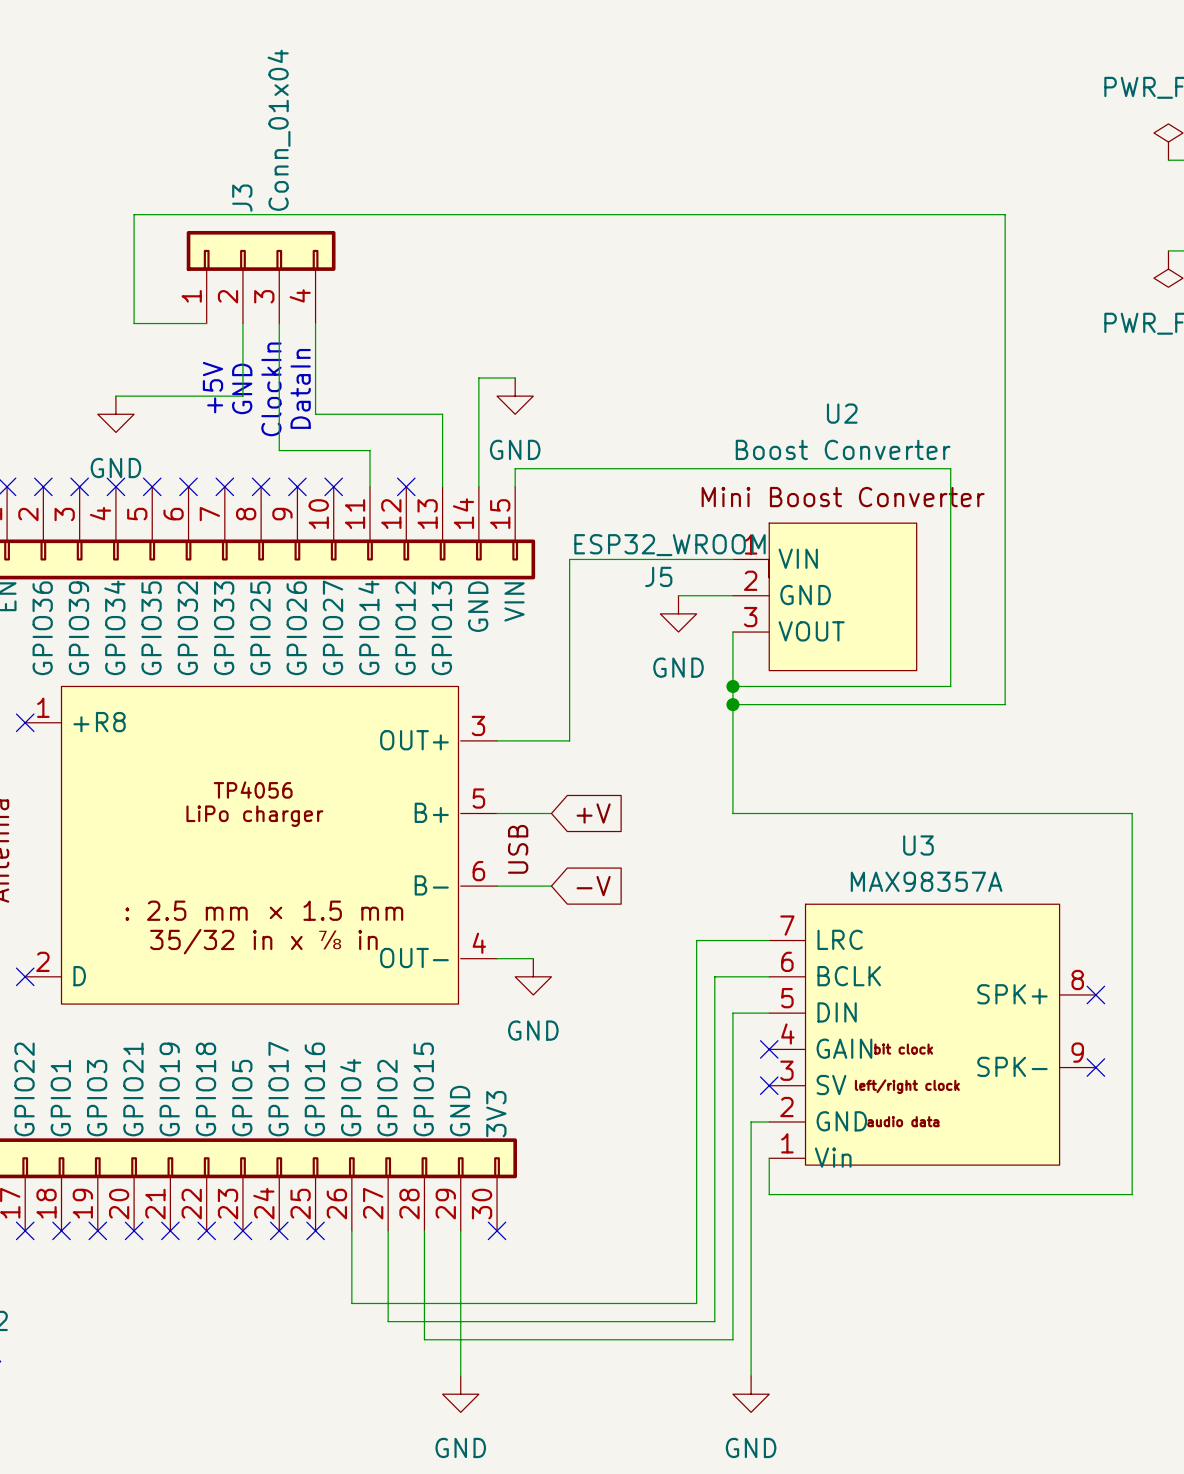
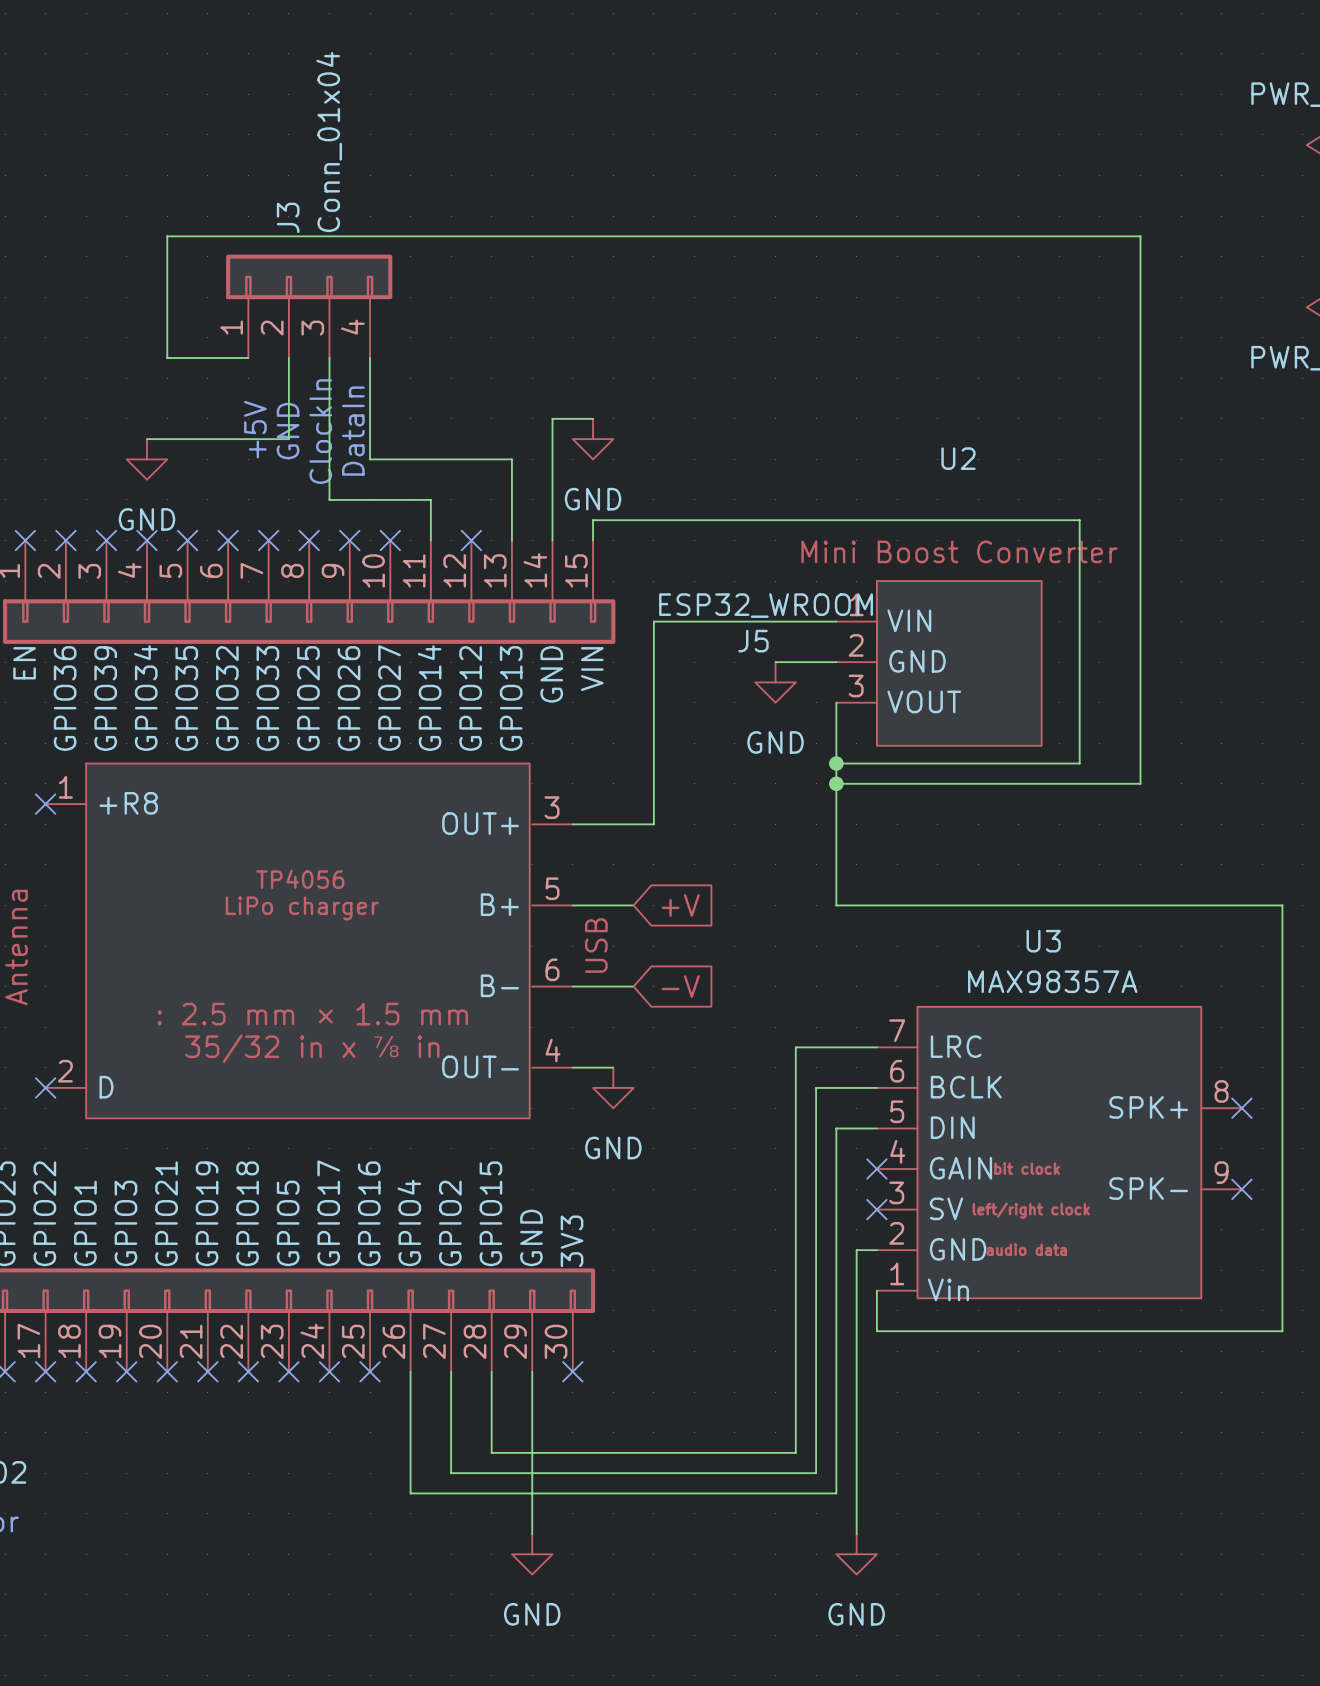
U2 value: Boost Converter (843, 449) -> none
wire: (351, 1303) (424, 1303) (424, 1339) -> (410, 1452) (410, 1493) (491, 1493)

